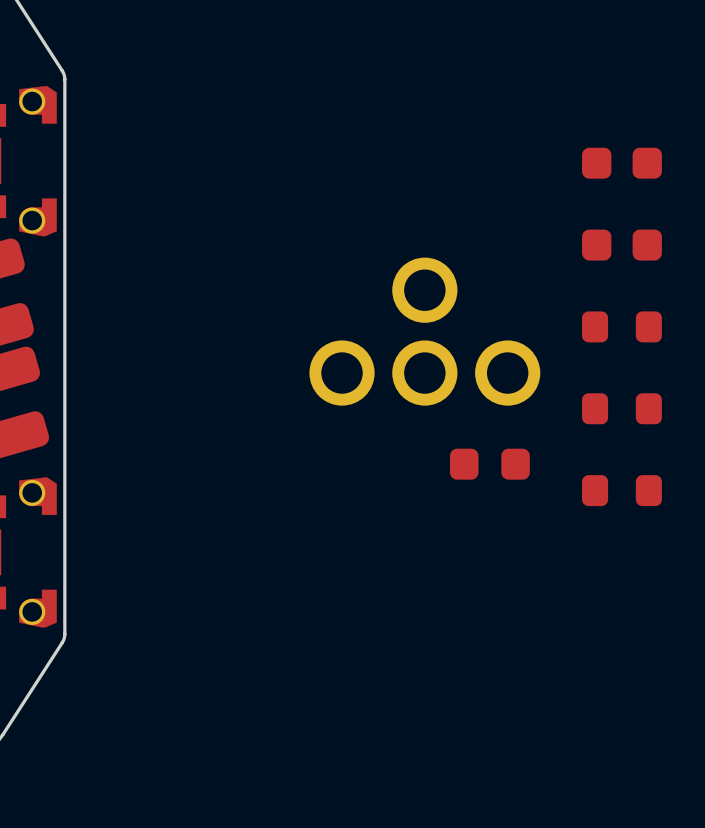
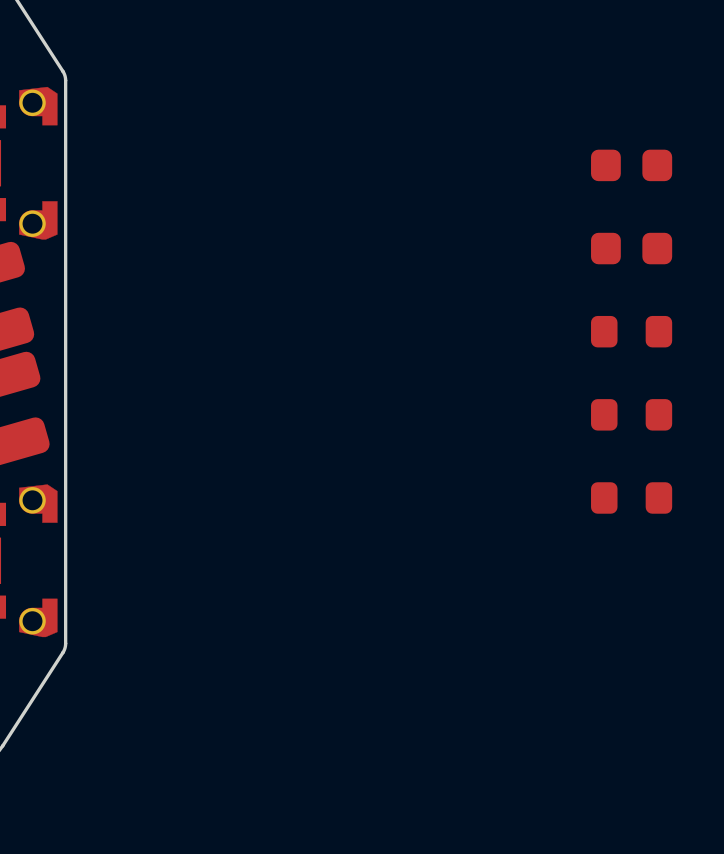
part: (424, 331) -> none
part: (489, 464) -> none

